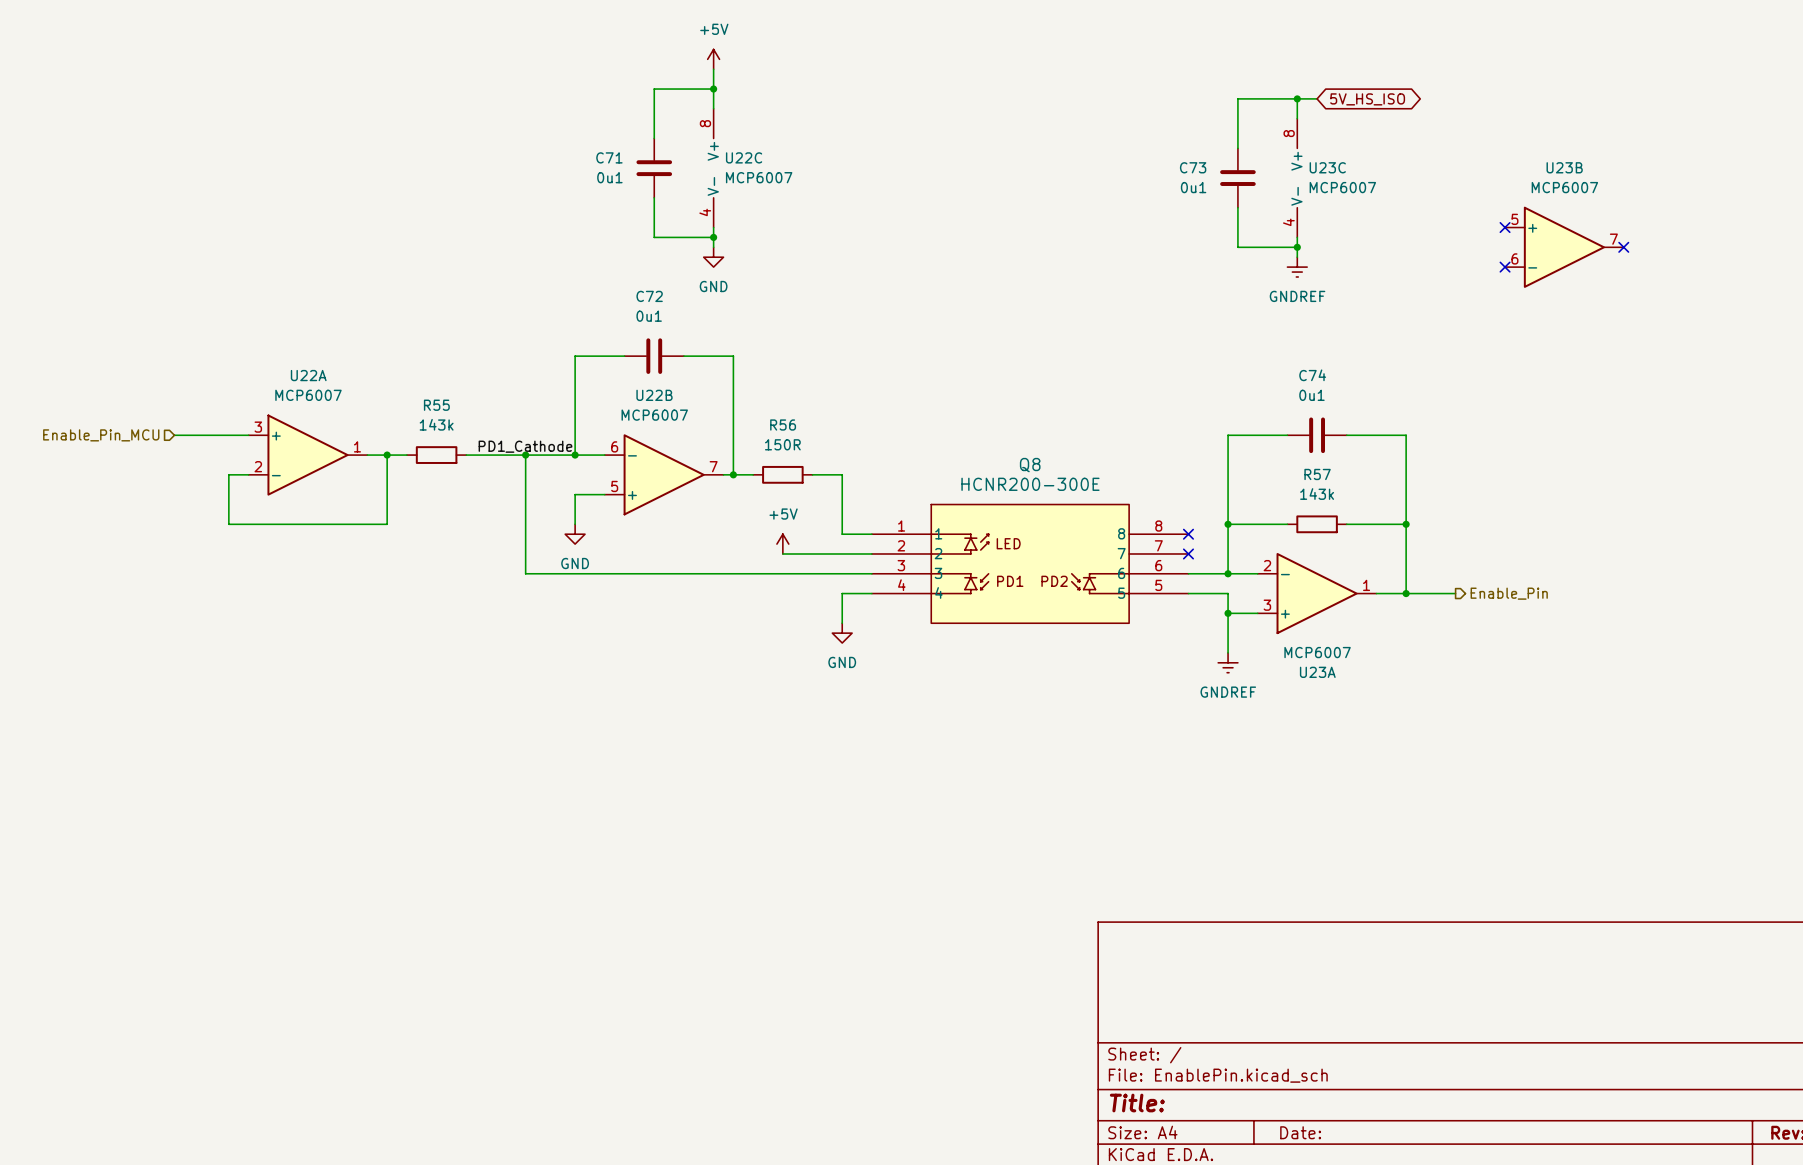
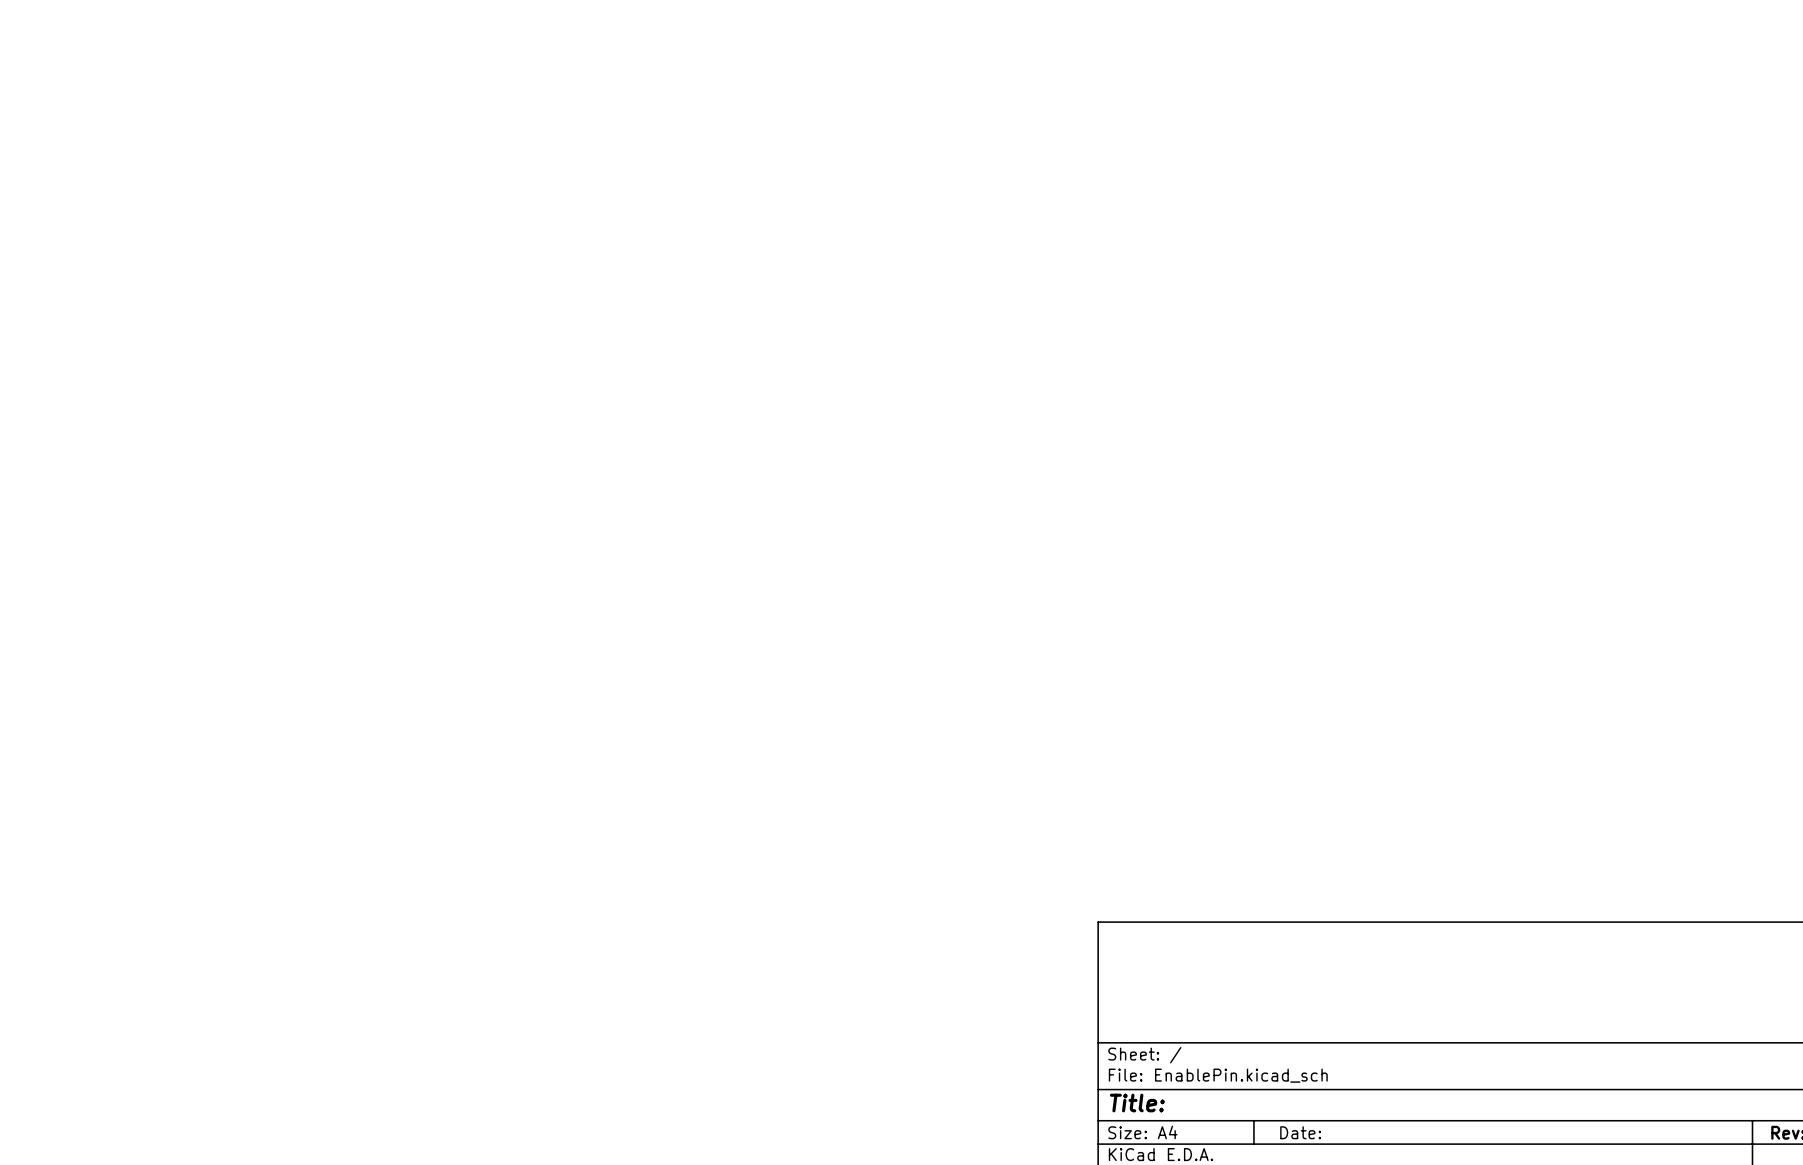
power symbol: +5V (713, 59) -> none
wire: (713, 69) (713, 108) -> none
wire: (713, 89) (654, 89) (654, 138) -> none
junction: (713, 89) -> none
wire: (1297, 98) (1297, 118) -> none
junction: (1297, 98) -> none
wire: (1317, 98) (1237, 98) (1237, 148) -> none
global label: 5V_HS_ISO (1367, 99) -> none
C71: 0u1 (654, 168) -> none
U22C: MCP6007 (713, 168) -> none
C73: 0u1 (1237, 178) -> none
U23C: MCP6007 (1297, 178) -> none
wire: (654, 197) (654, 237) (713, 237) -> none
wire: (1237, 207) (1237, 247) (1297, 247) -> none
wire: (713, 227) (713, 247) -> none
no-connect mark: (1505, 227) -> none
junction: (713, 237) -> none
wire: (1297, 237) (1297, 257) -> none
junction: (1297, 247) -> none
U23B: MCP6007 (1564, 247) -> none
no-connect mark: (1623, 247) -> none
power symbol: GND (713, 257) -> none
power symbol: GNDREF (1297, 267) -> none
no-connect mark: (1505, 267) -> none
wire: (624, 356) (575, 356) (575, 455) -> none
C72: 0u1 (654, 356) -> none
wire: (683, 356) (733, 356) (733, 474) -> none
hierarchical label: Enable_Pin_MCU (101, 435) -> none
wire: (174, 435) (248, 435) -> none
wire: (1287, 435) (1228, 435) (1228, 573) -> none
C74: 0u1 (1317, 435) -> none
wire: (1346, 435) (1406, 435) (1406, 593) -> none
label: PD1_Cathode (525, 446) -> none
U22A: MCP6007 (308, 455) -> none
wire: (367, 455) (406, 455) -> none
wire: (387, 455) (387, 524) (228, 524) (228, 474) (248, 474) -> none
junction: (387, 455) -> none
R55: 143k (436, 455) -> none
wire: (466, 455) (604, 455) -> none
wire: (525, 455) (525, 573) (871, 573) -> none
junction: (525, 455) -> none
junction: (575, 455) -> none
U22B: MCP6007 (664, 474) -> none
wire: (723, 474) (753, 474) -> none
junction: (733, 474) -> none
R56: 150R (782, 474) -> none
wire: (812, 474) (842, 474) (842, 534) (871, 534) -> none
wire: (604, 494) (575, 494) (575, 524) -> none
wire: (1228, 524) (1287, 524) -> none
junction: (1228, 524) -> none
R57: 143k (1317, 524) -> none
wire: (1346, 524) (1406, 524) -> none
junction: (1406, 524) -> none
power symbol: GND (575, 534) -> none
no-connect mark: (1188, 534) -> none
power symbol: +5V (782, 544) -> none
wire: (782, 553) (871, 553) -> none
no-connect mark: (1188, 553) -> none
Q8: HCNR200-300E (1030, 563) -> none
wire: (1188, 573) (1257, 573) -> none
junction: (1228, 573) -> none
wire: (871, 593) (842, 593) (842, 623) -> none
wire: (1188, 593) (1228, 593) (1228, 652) -> none
U23A: MCP6007 (1317, 593) -> none
wire: (1376, 593) (1455, 593) -> none
junction: (1406, 593) -> none
hierarchical label: Enable_Pin (1509, 593) -> none
wire: (1228, 613) (1257, 613) -> none
junction: (1228, 613) -> none
power symbol: GND (842, 633) -> none
power symbol: GNDREF (1228, 662) -> none

